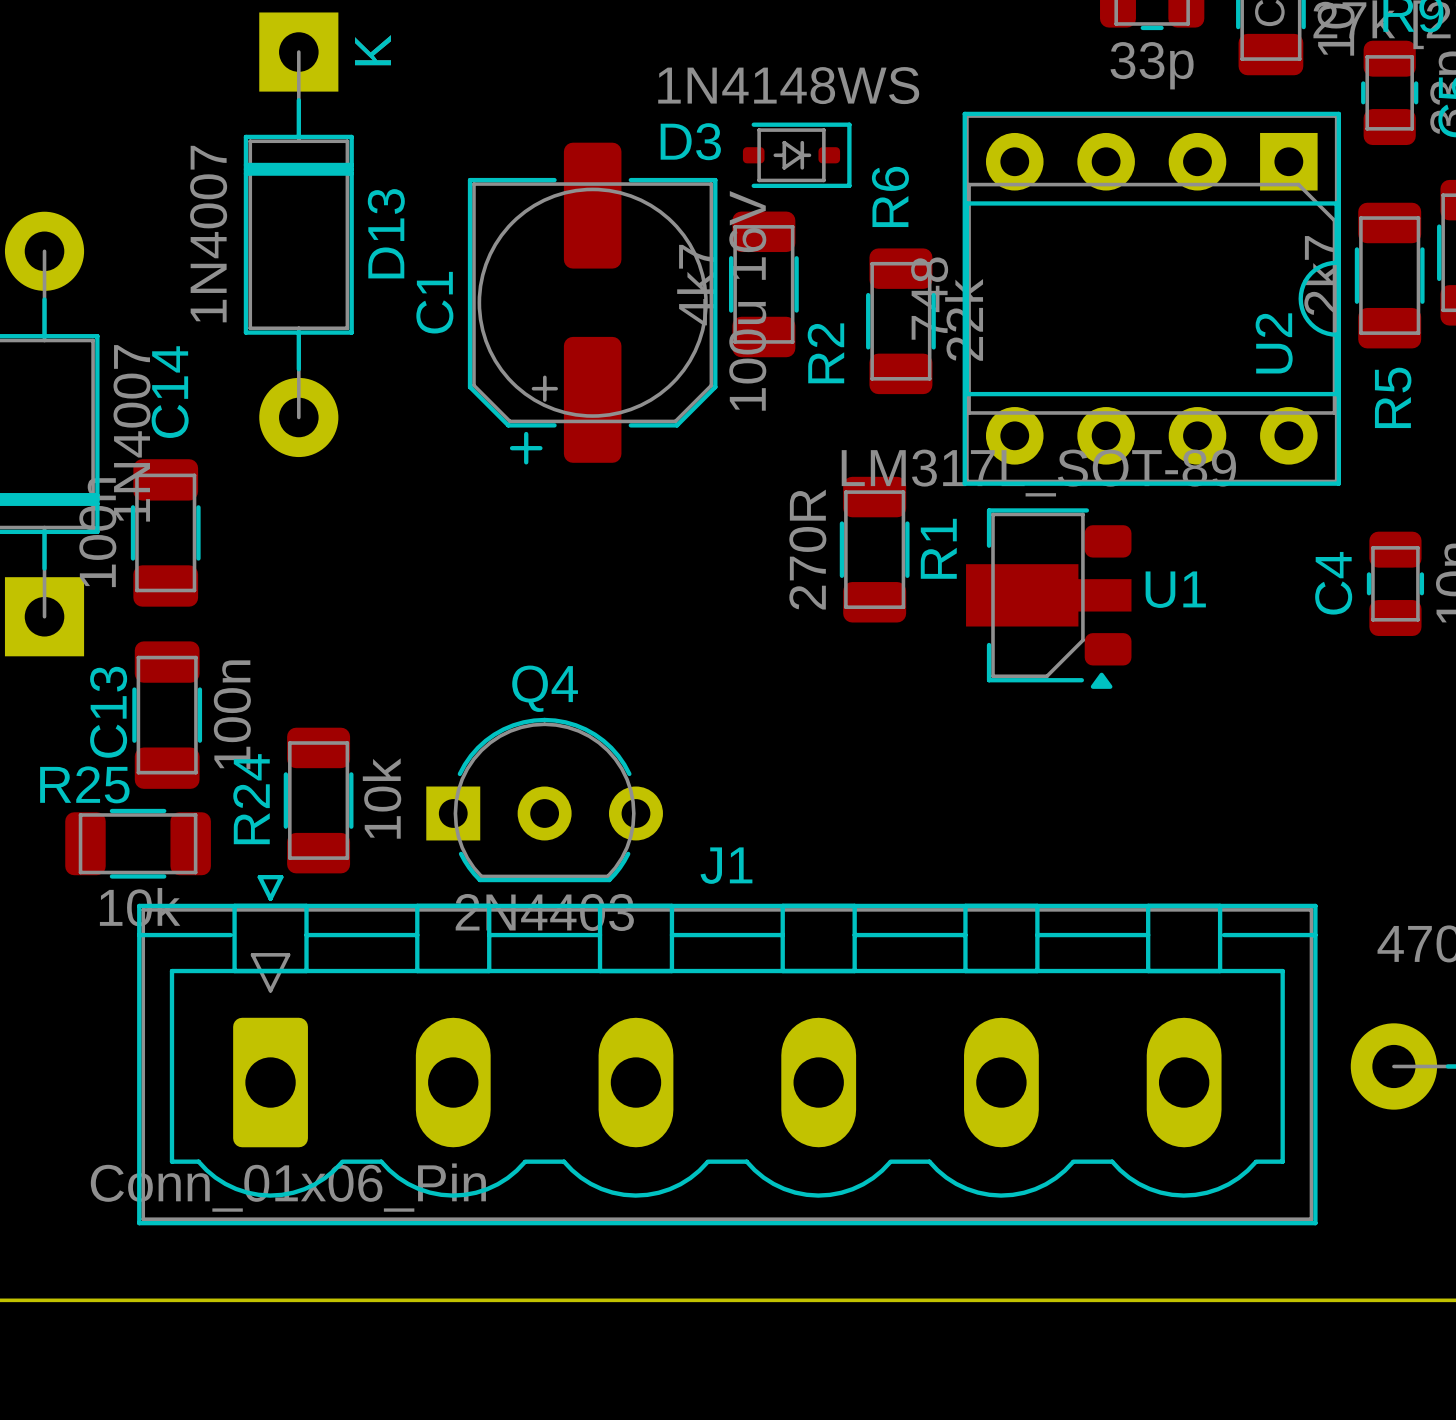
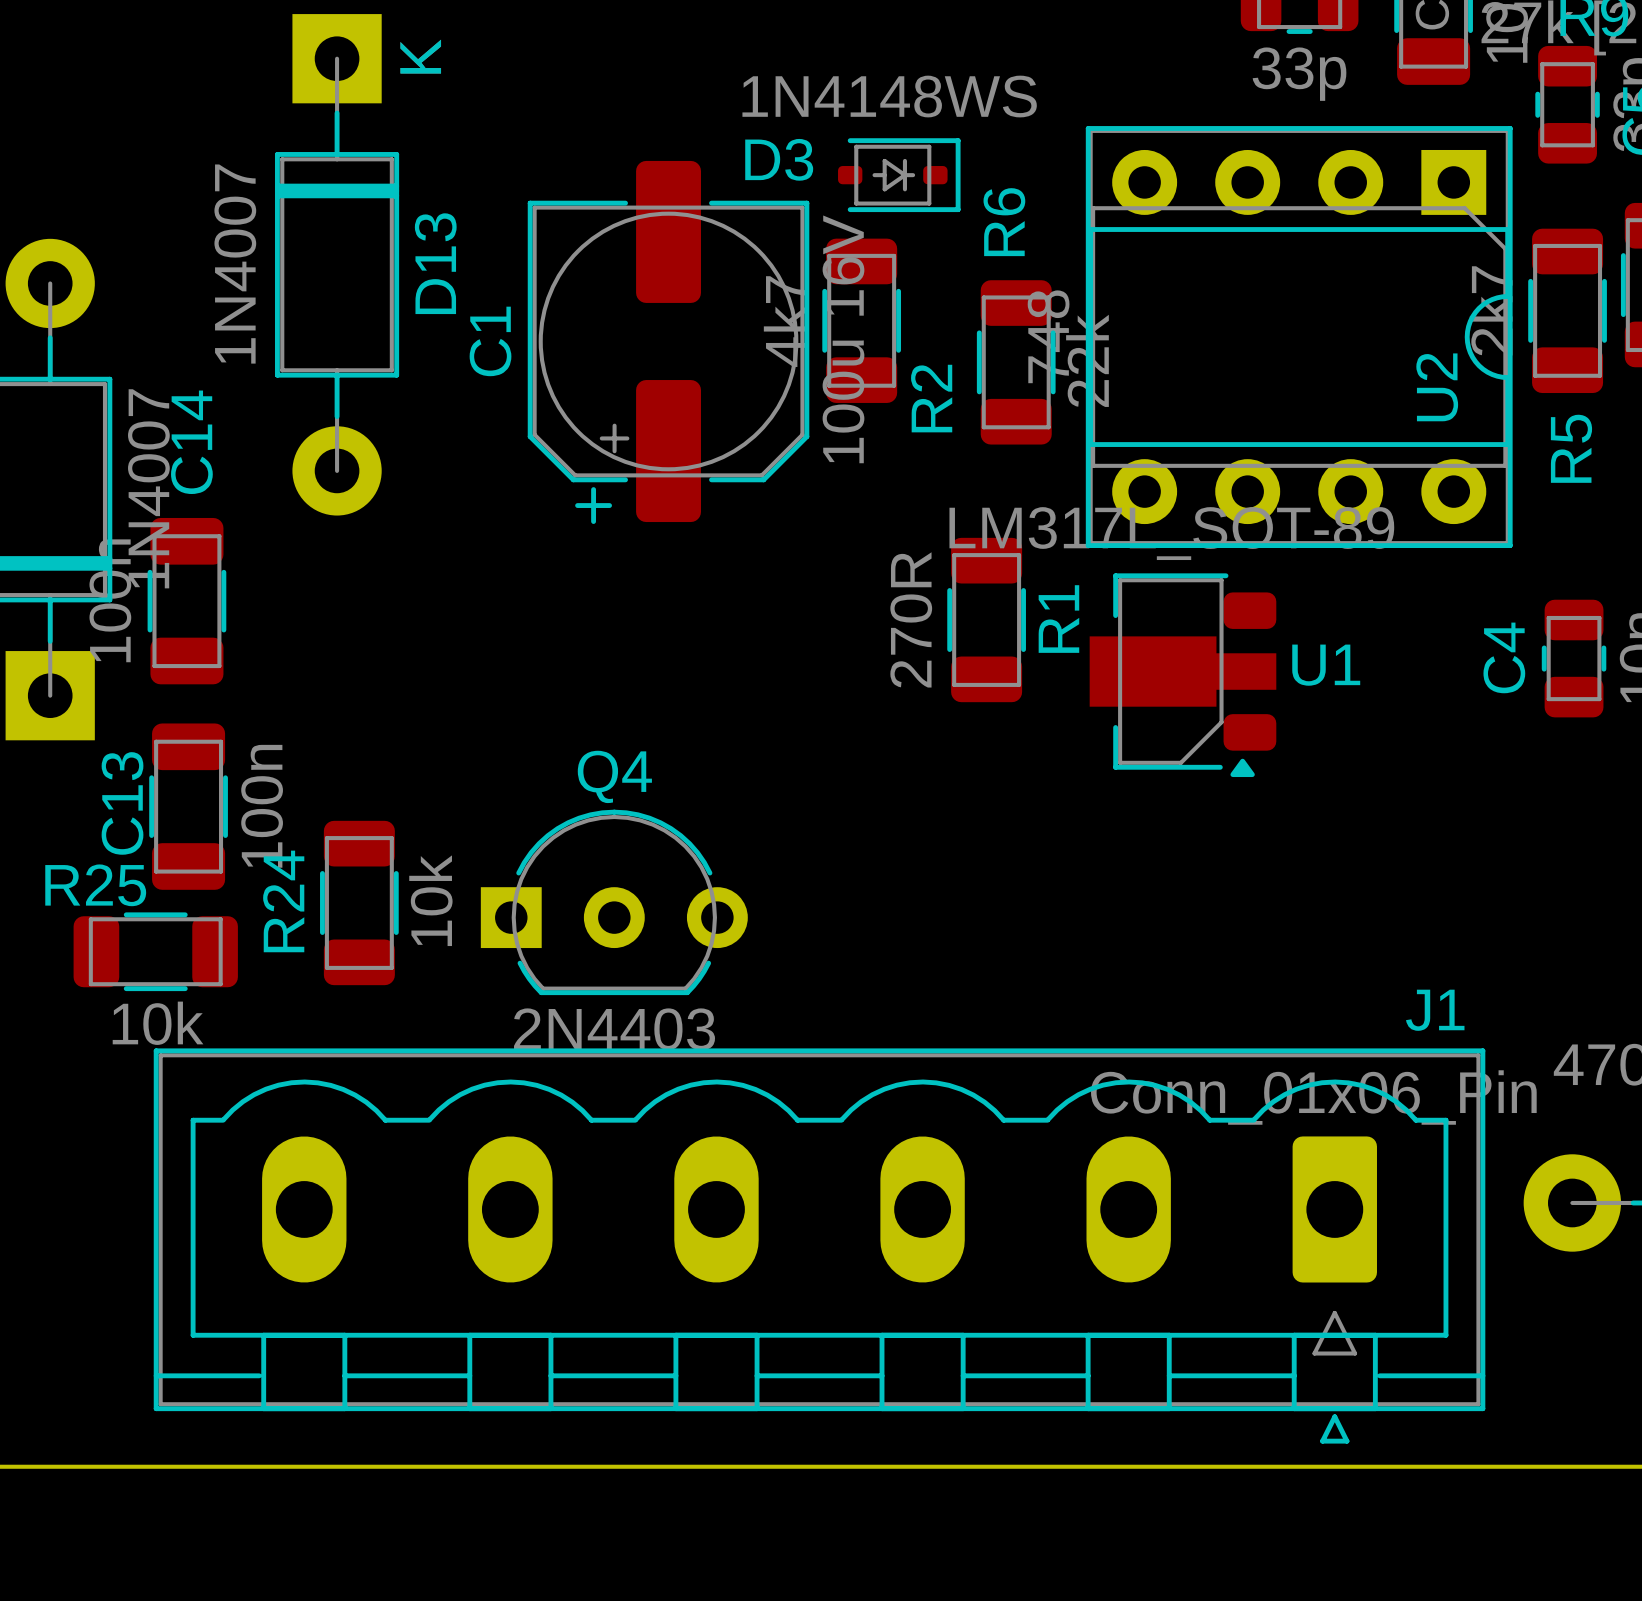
J1 name position: J1 (726, 865) -> J1 (1435, 1010)
J1 rotation: 0° (727, 1050) -> 180° (819, 1245)

